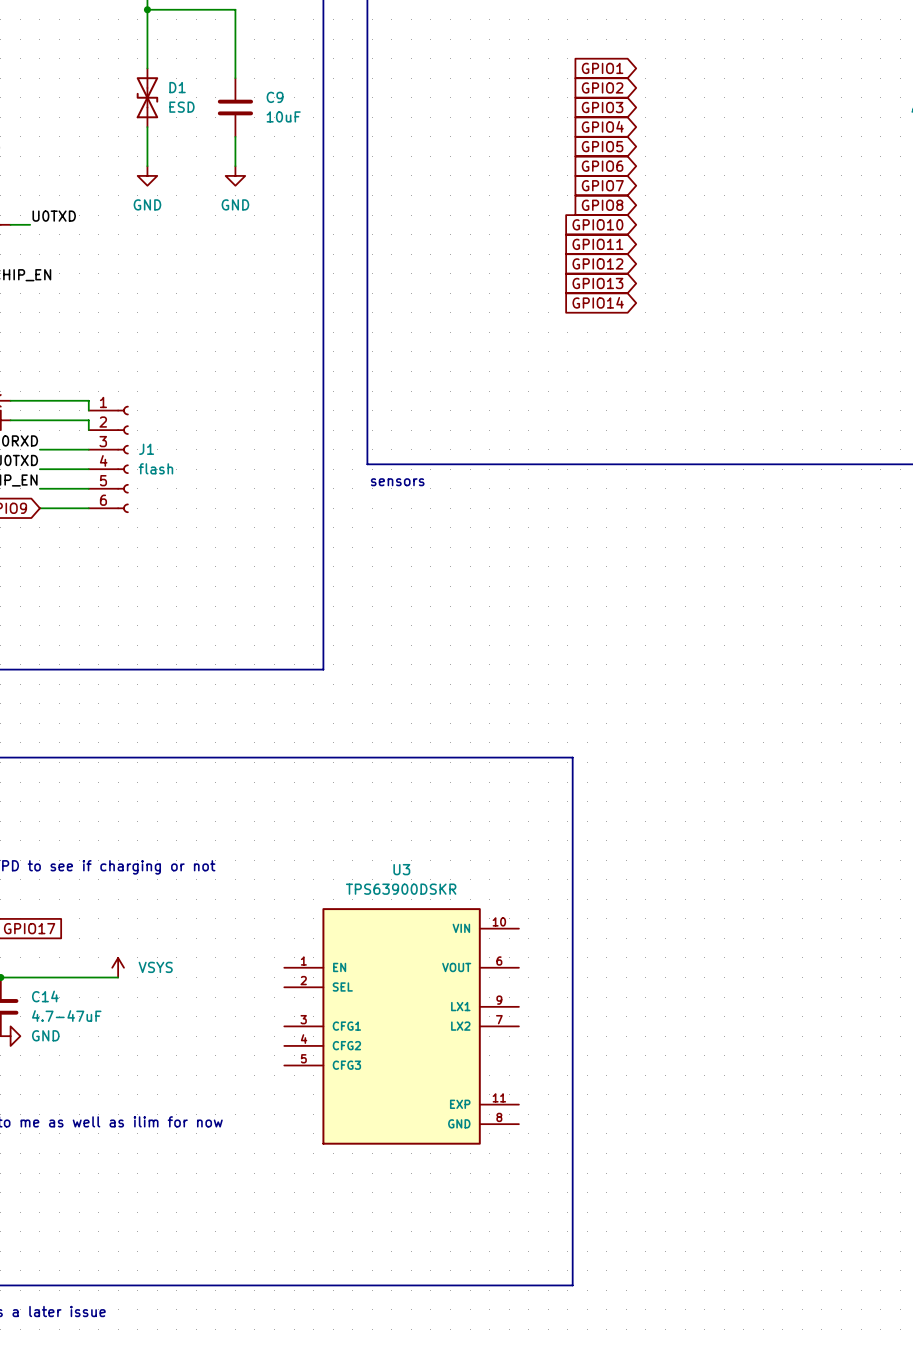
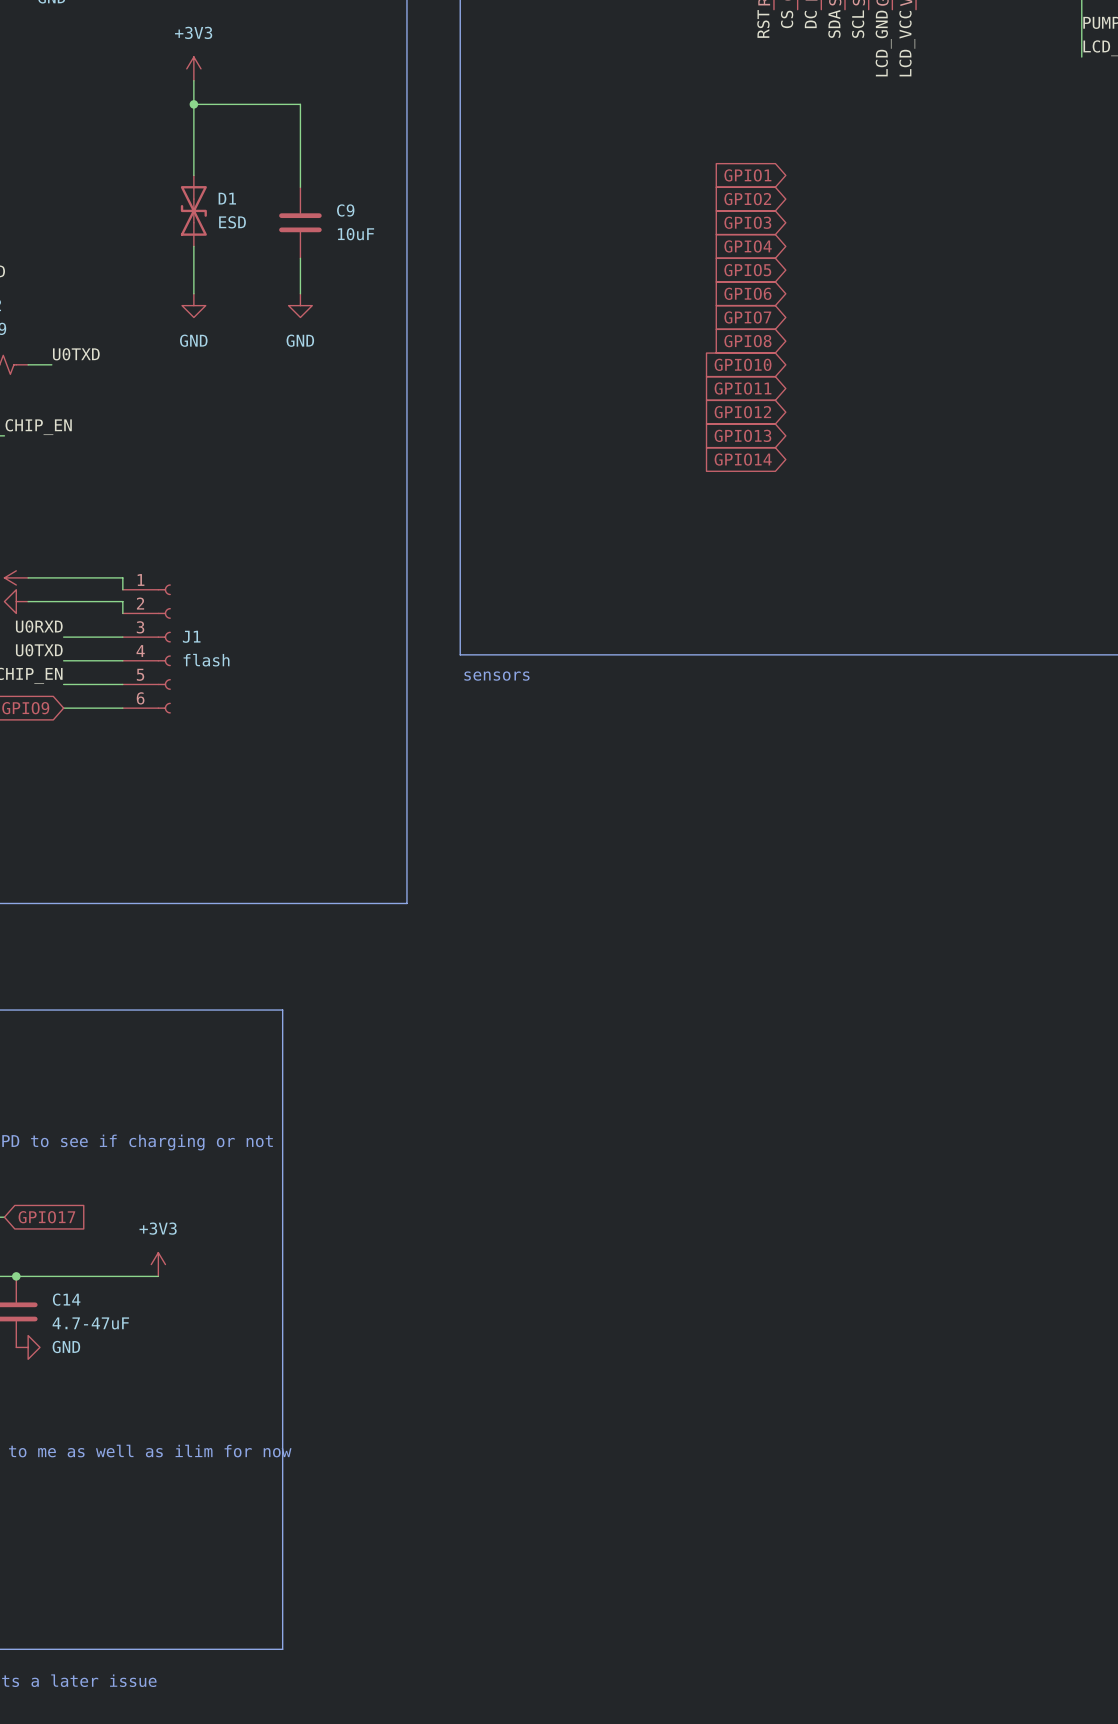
line: (220, 757) (572, 757) (572, 1285) (220, 1285) -> (282, 1010) (282, 1649)
power symbol: VSYS (118, 967) -> +3V3 (158, 1264)
U3: TPS63900DSKR (401, 1026) -> none

